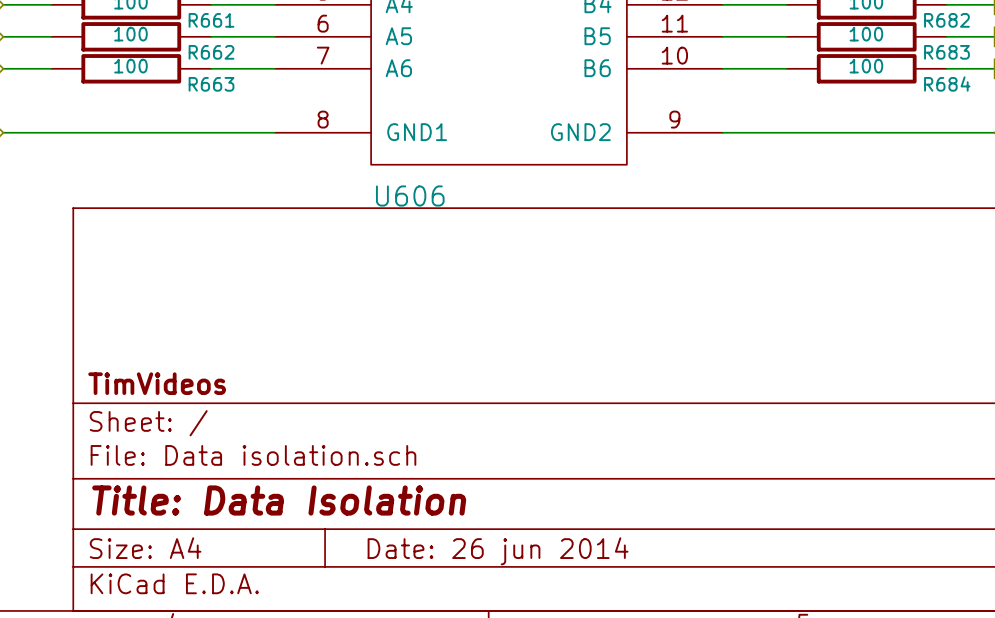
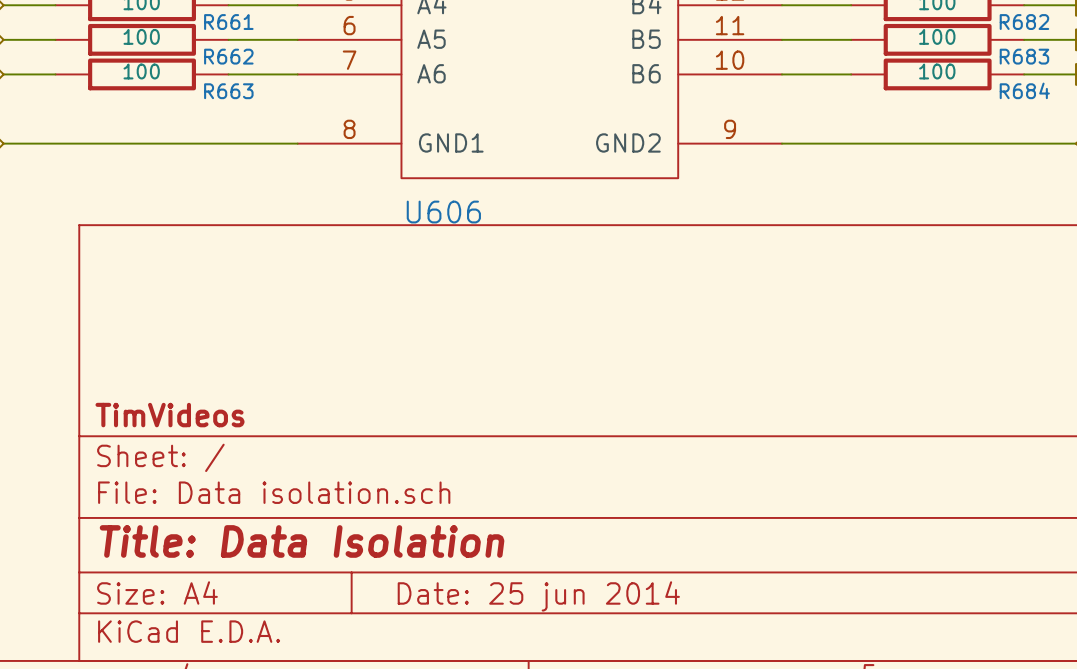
title block: Date: 26 jun 2014 (498, 551) -> Date: 25 jun 2014 (538, 596)

